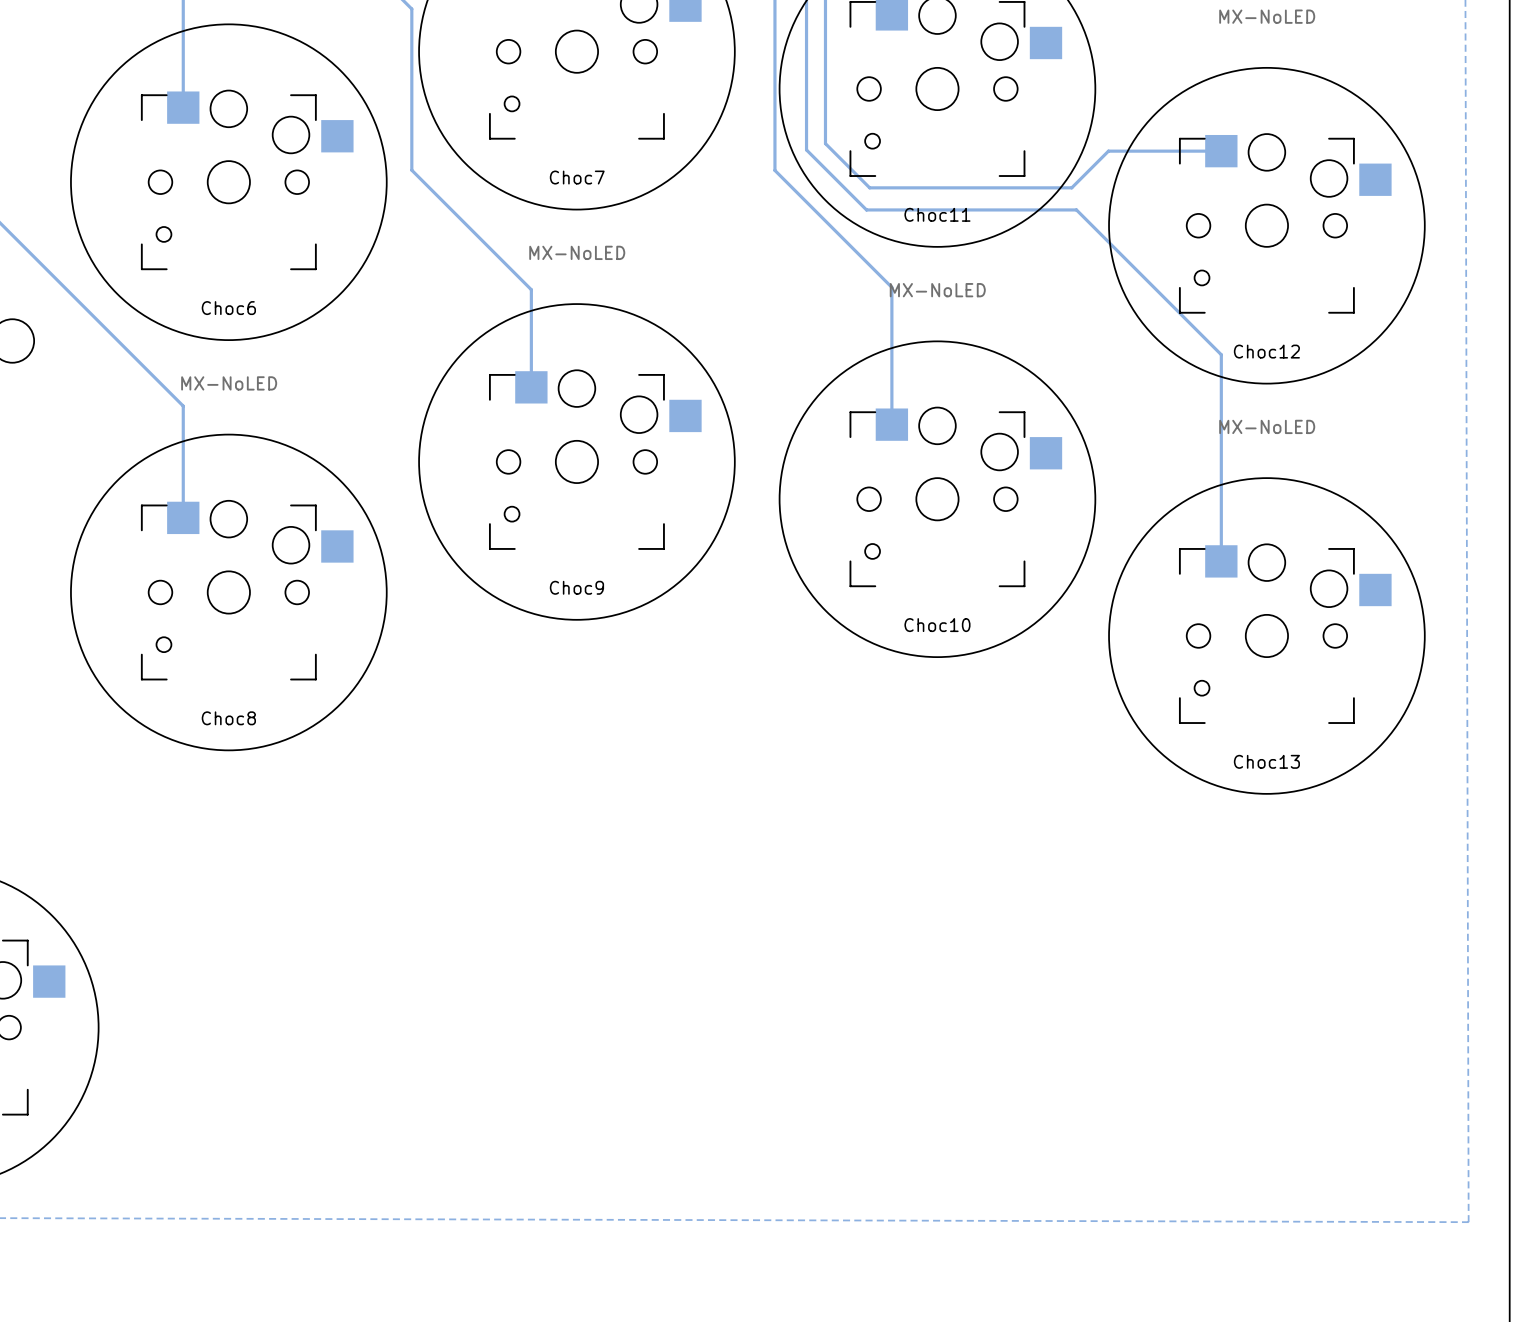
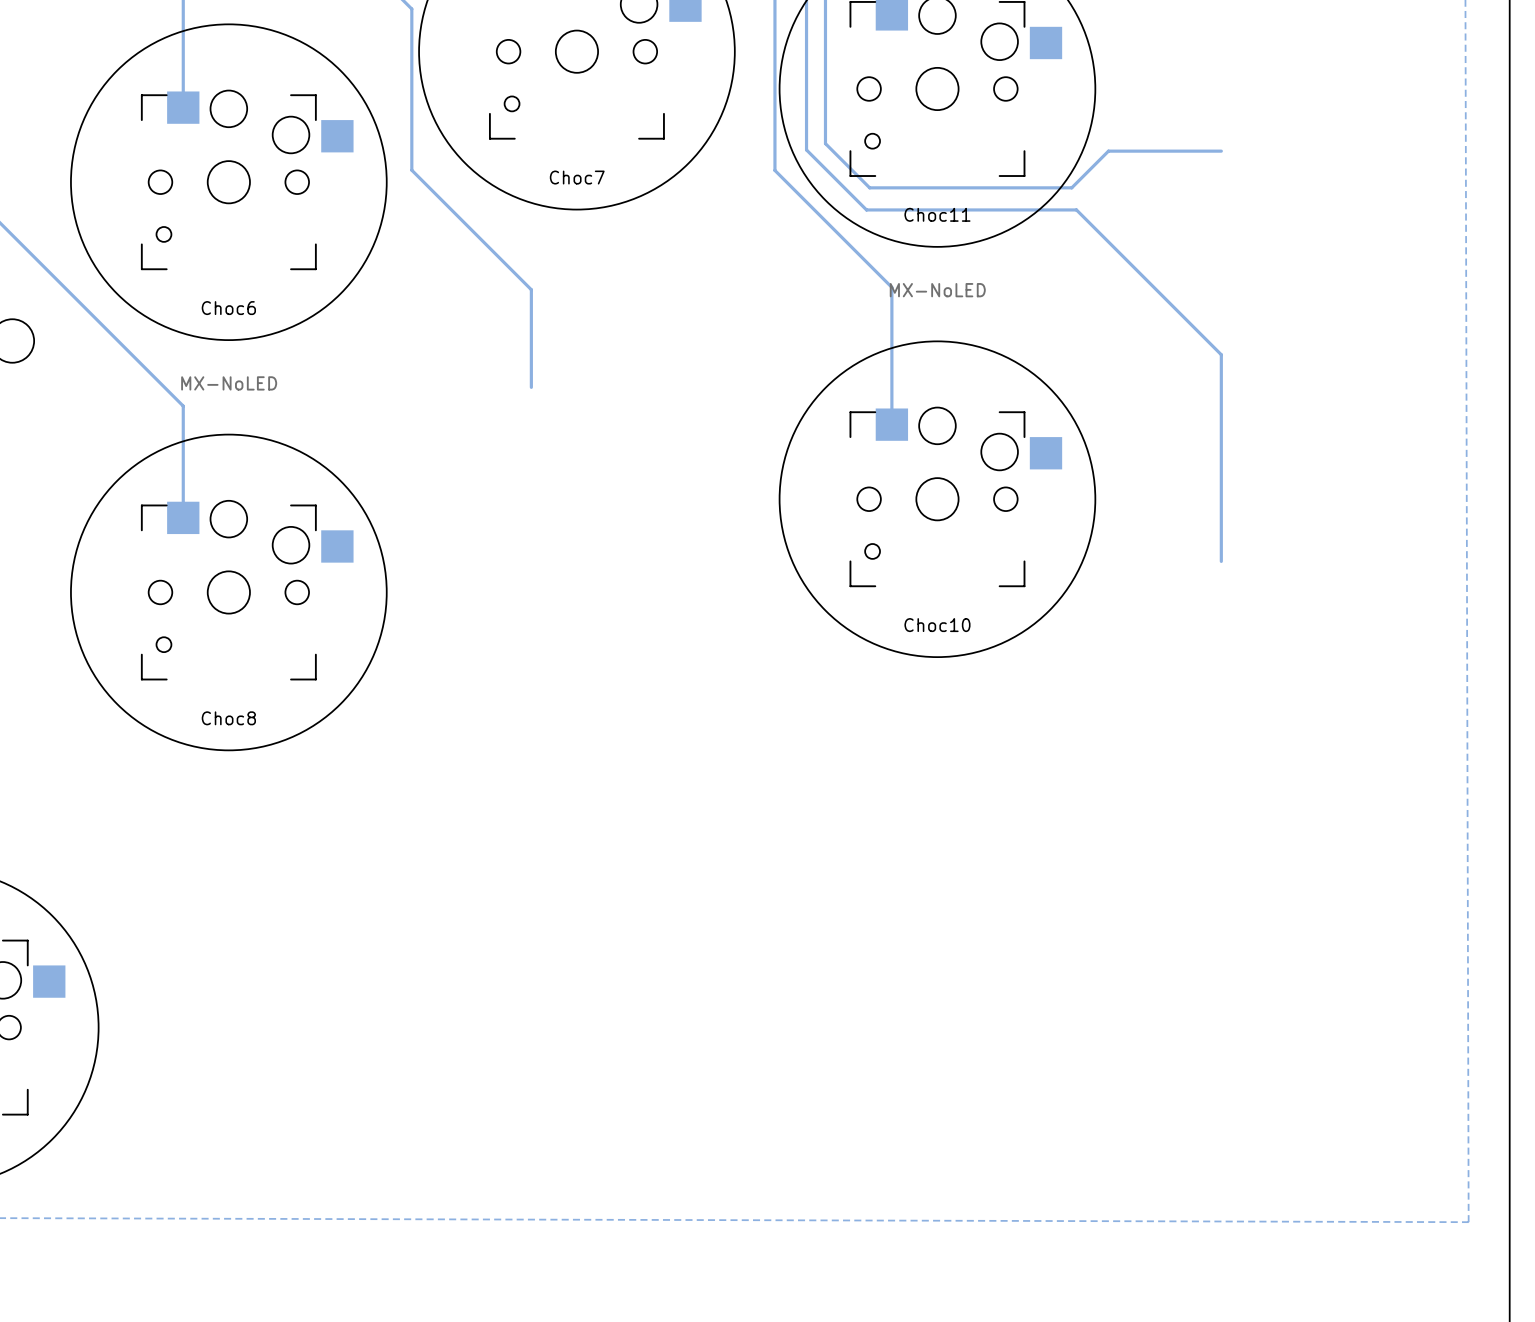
Choc12: MX-NoLED (1266, 225) -> none
Choc9: MX-NoLED (576, 461) -> none
Choc13: MX-NoLED (1266, 635) -> none

